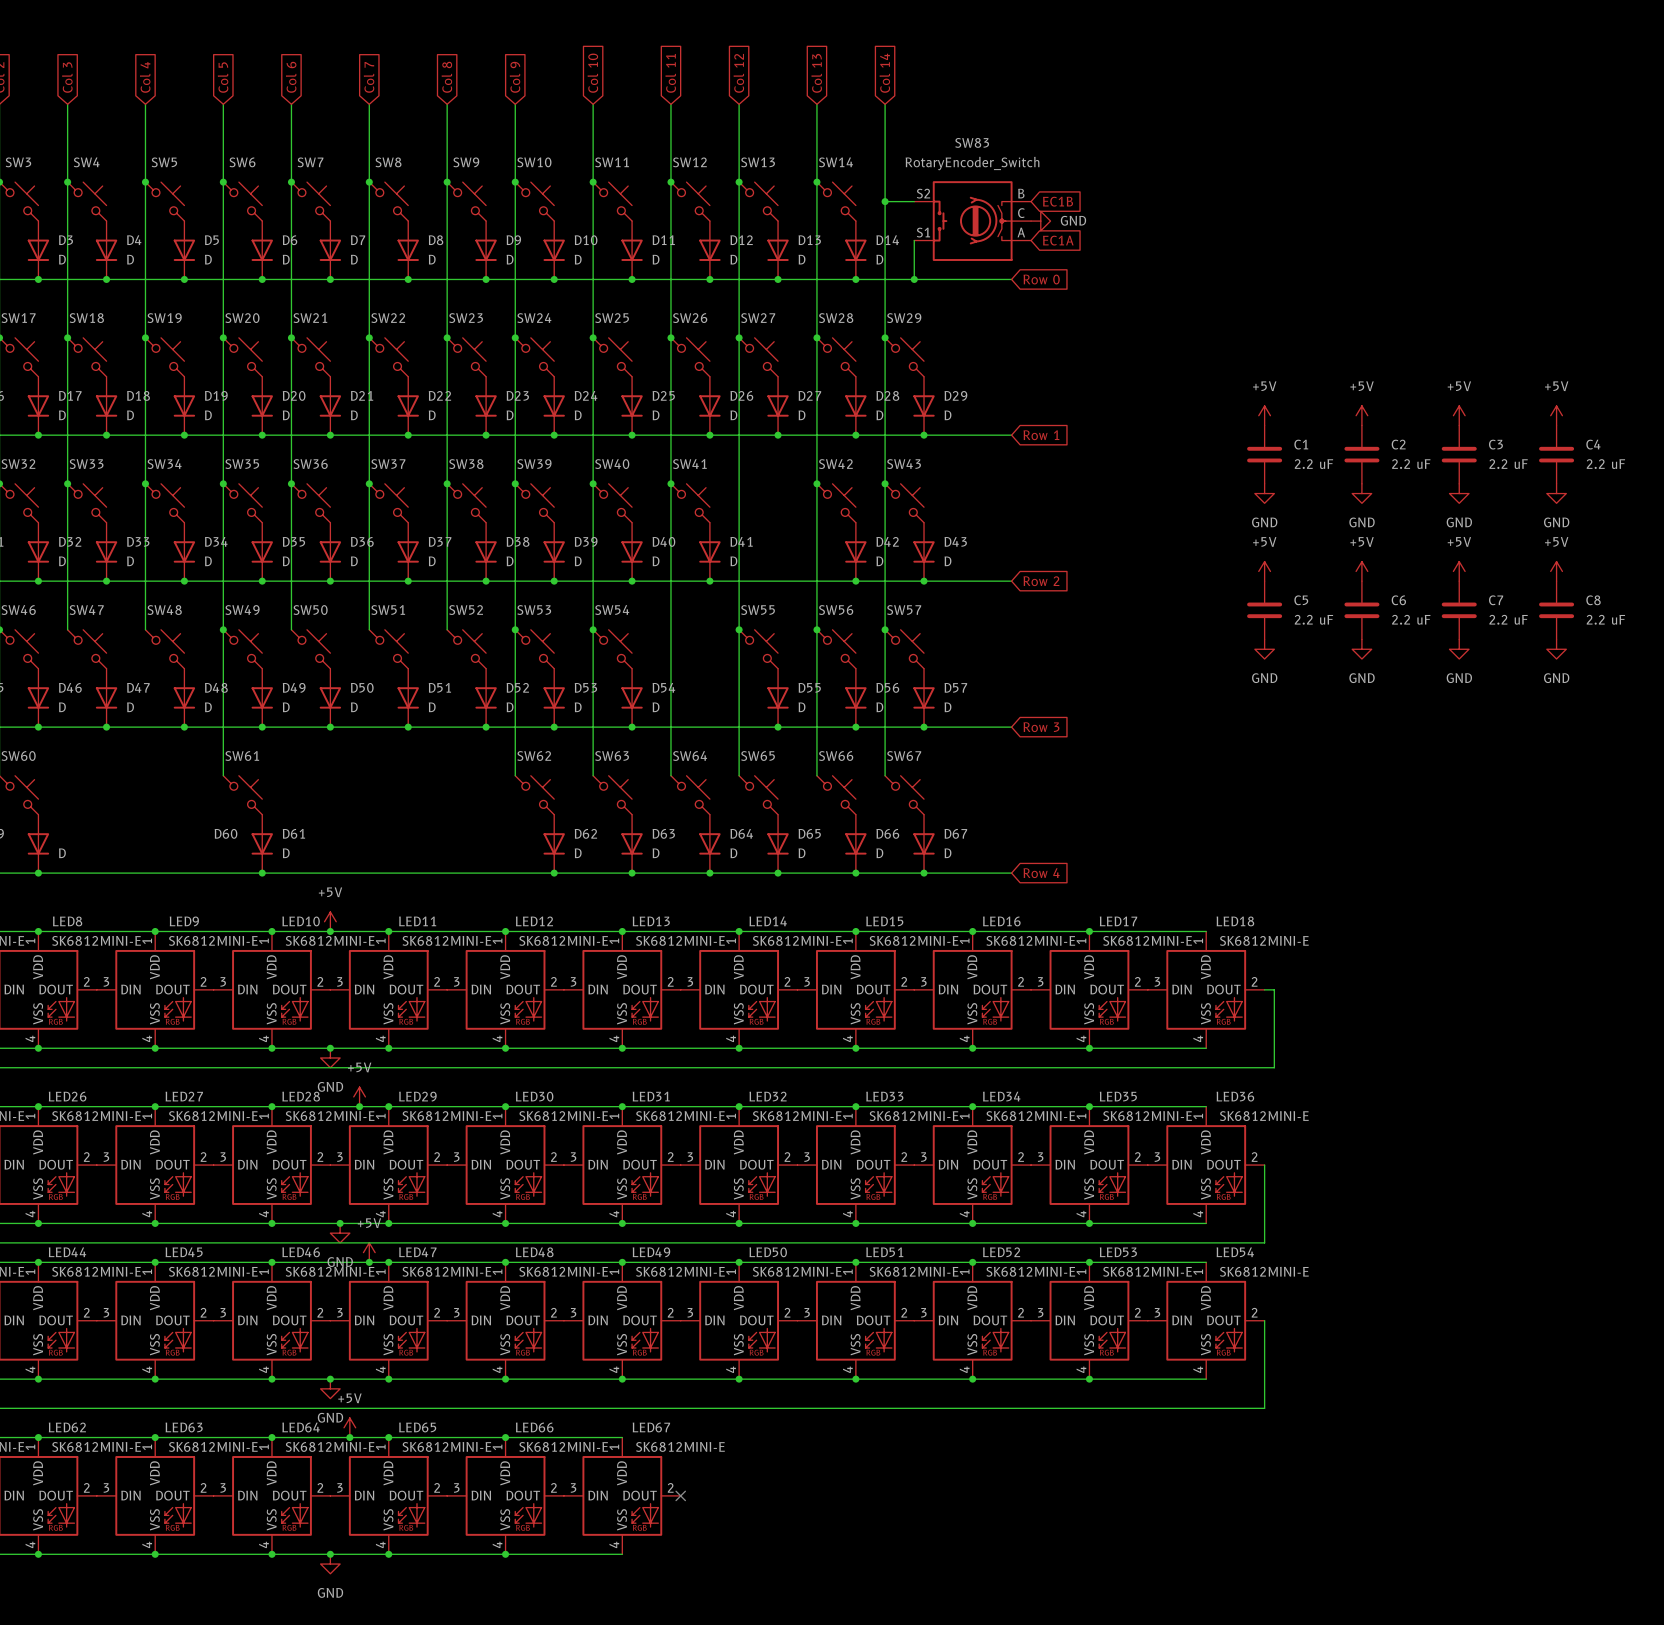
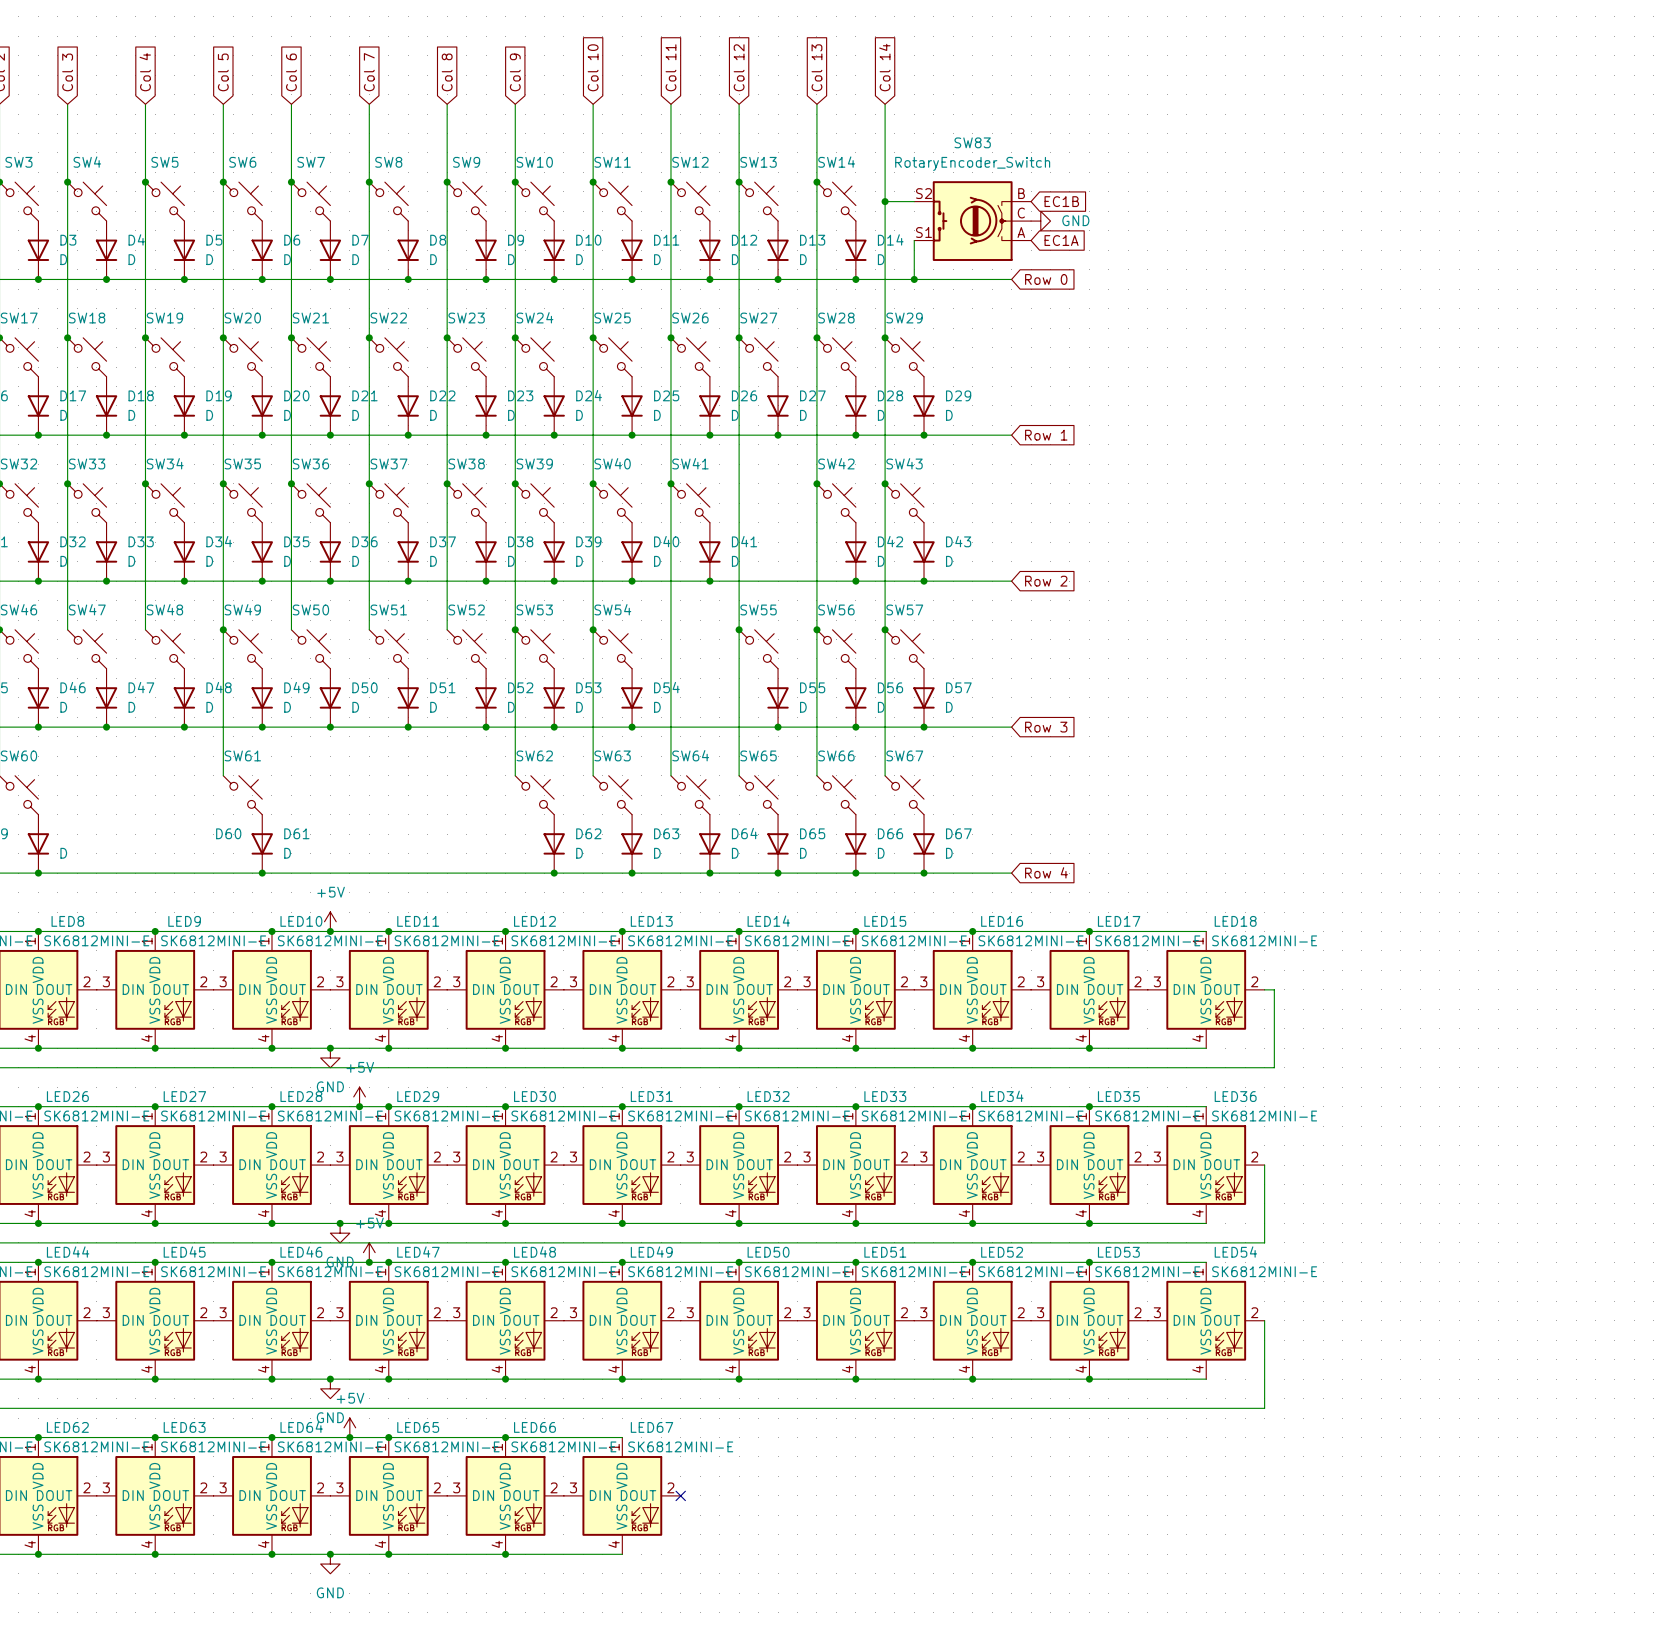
power symbol: +5V (1264, 415) -> none
power symbol: +5V (1361, 415) -> none
power symbol: +5V (1459, 415) -> none
power symbol: +5V (1556, 415) -> none
C1: 2.2 uF (1264, 454) -> none
C2: 2.2 uF (1361, 454) -> none
C3: 2.2 uF (1459, 454) -> none
C4: 2.2 uF (1556, 454) -> none
power symbol: GND (1264, 493) -> none
power symbol: GND (1361, 493) -> none
power symbol: GND (1459, 493) -> none
power symbol: GND (1556, 493) -> none
power symbol: +5V (1264, 571) -> none
power symbol: +5V (1361, 571) -> none
power symbol: +5V (1459, 571) -> none
power symbol: +5V (1556, 571) -> none
C5: 2.2 uF (1264, 610) -> none
C6: 2.2 uF (1361, 610) -> none
C7: 2.2 uF (1459, 610) -> none
C8: 2.2 uF (1556, 610) -> none
power symbol: GND (1264, 649) -> none
power symbol: GND (1361, 649) -> none
power symbol: GND (1459, 649) -> none
power symbol: GND (1556, 649) -> none

